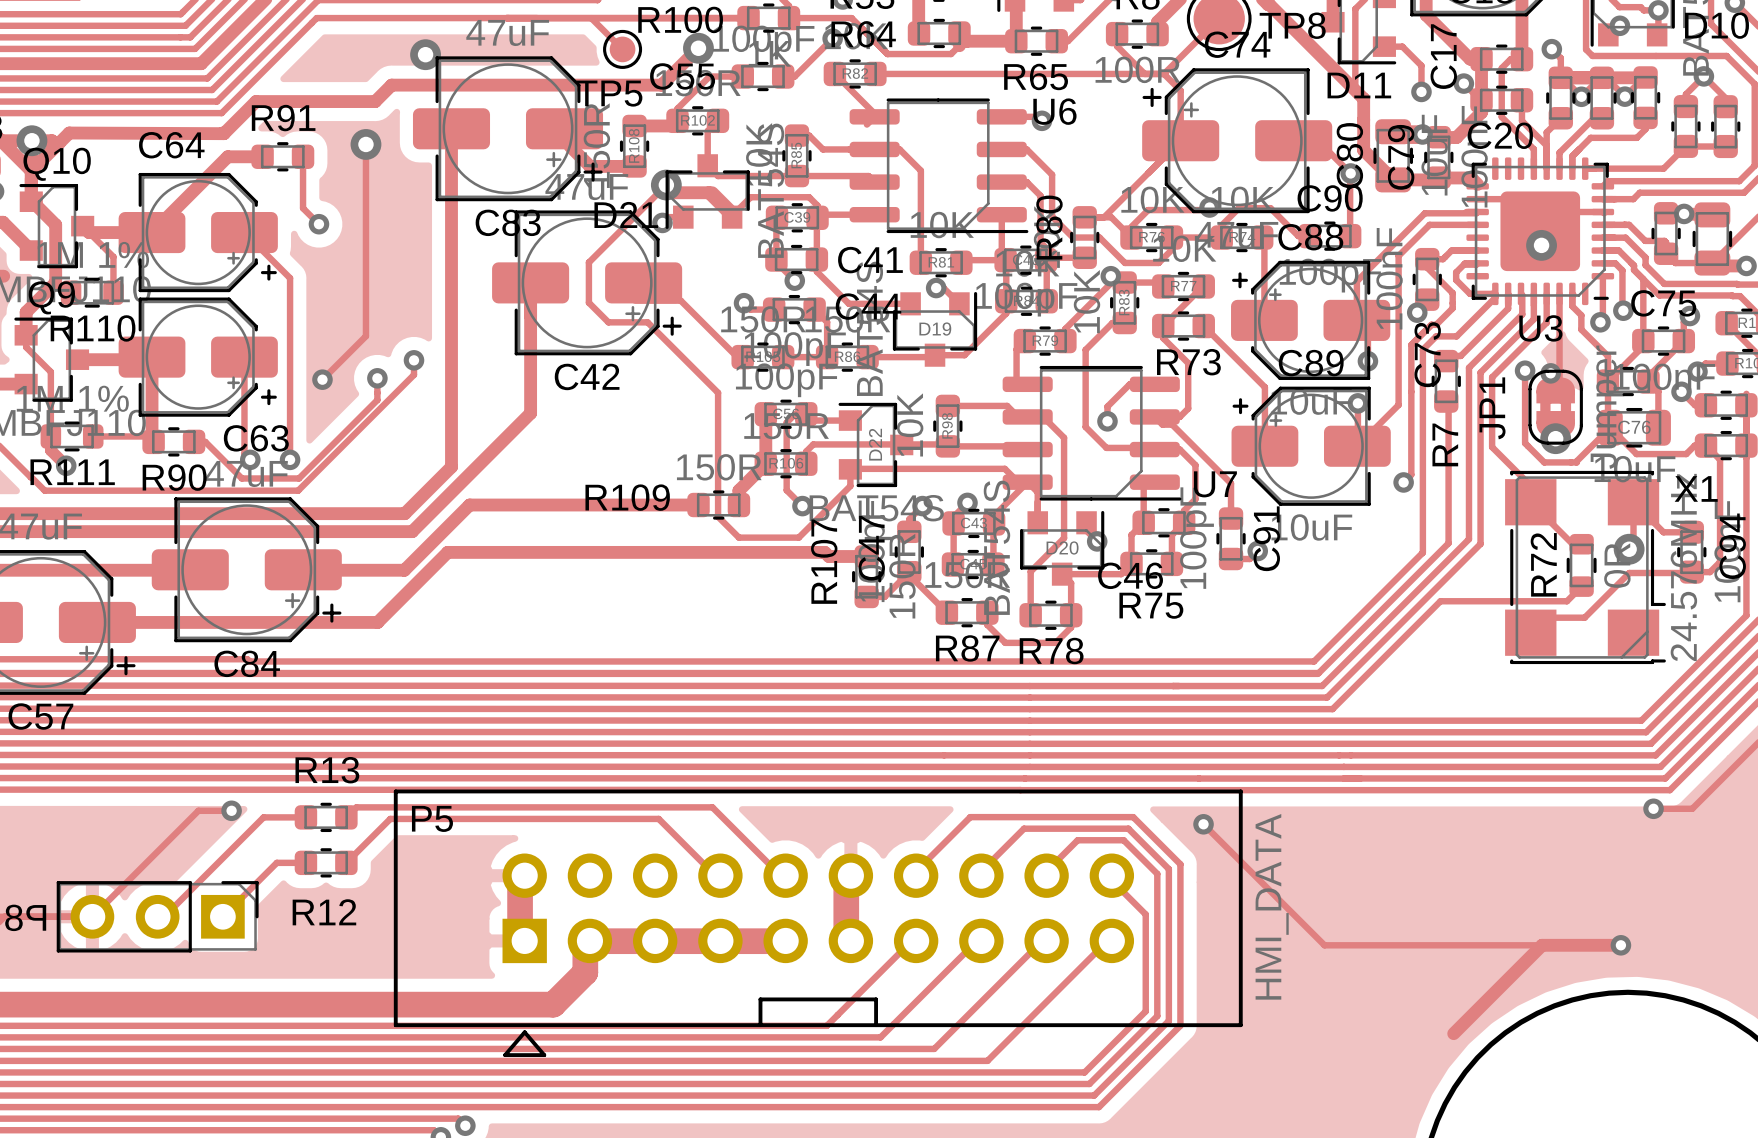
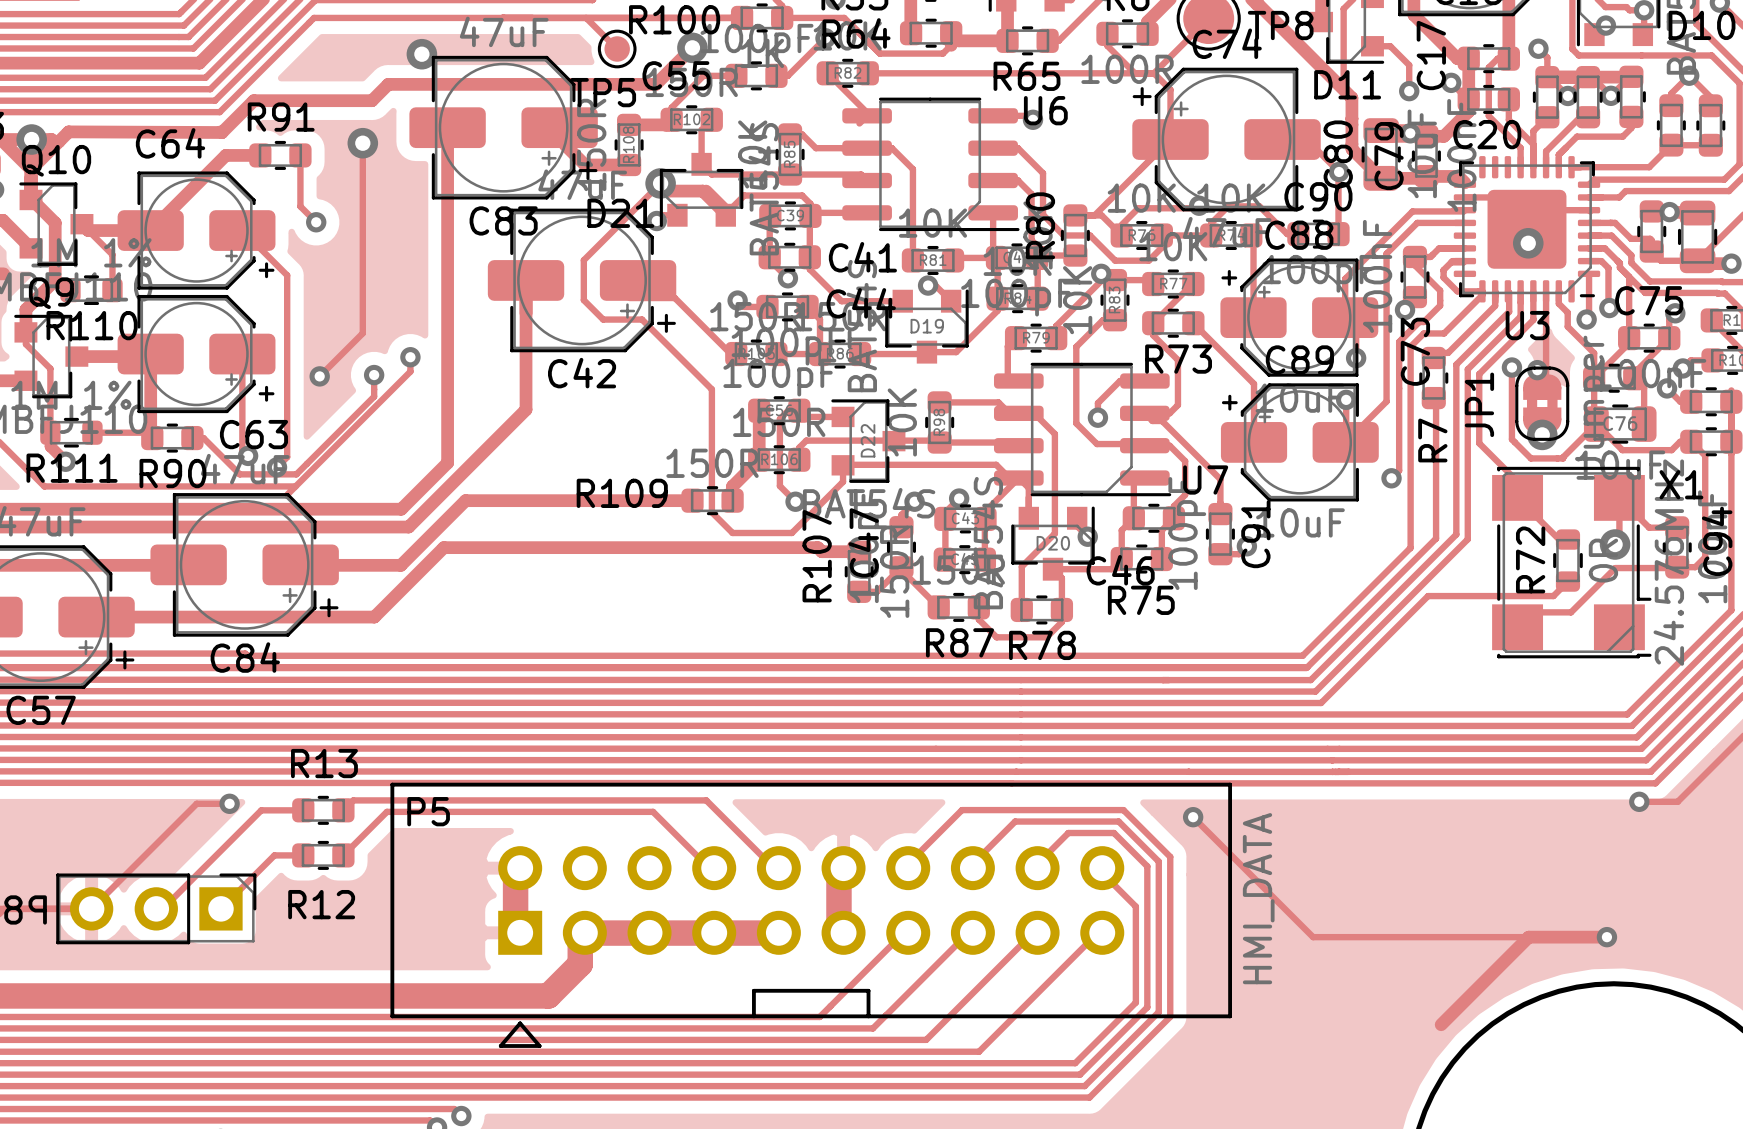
track: (289, 277) (290, 459) -> (287, 275) (287, 457) (277, 467)
via position: (290, 459) -> (277, 467)

